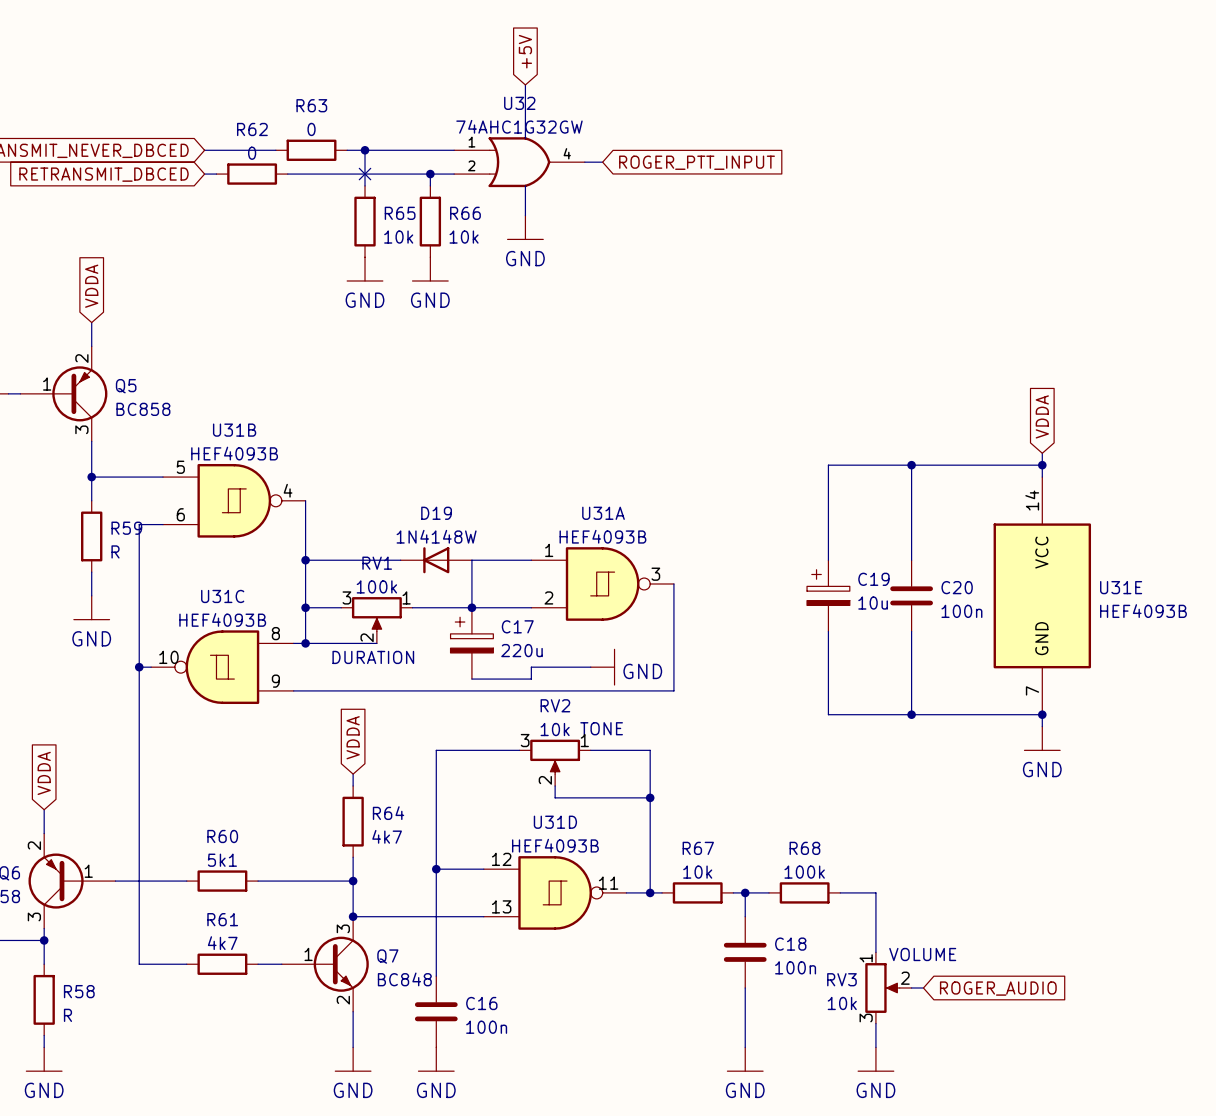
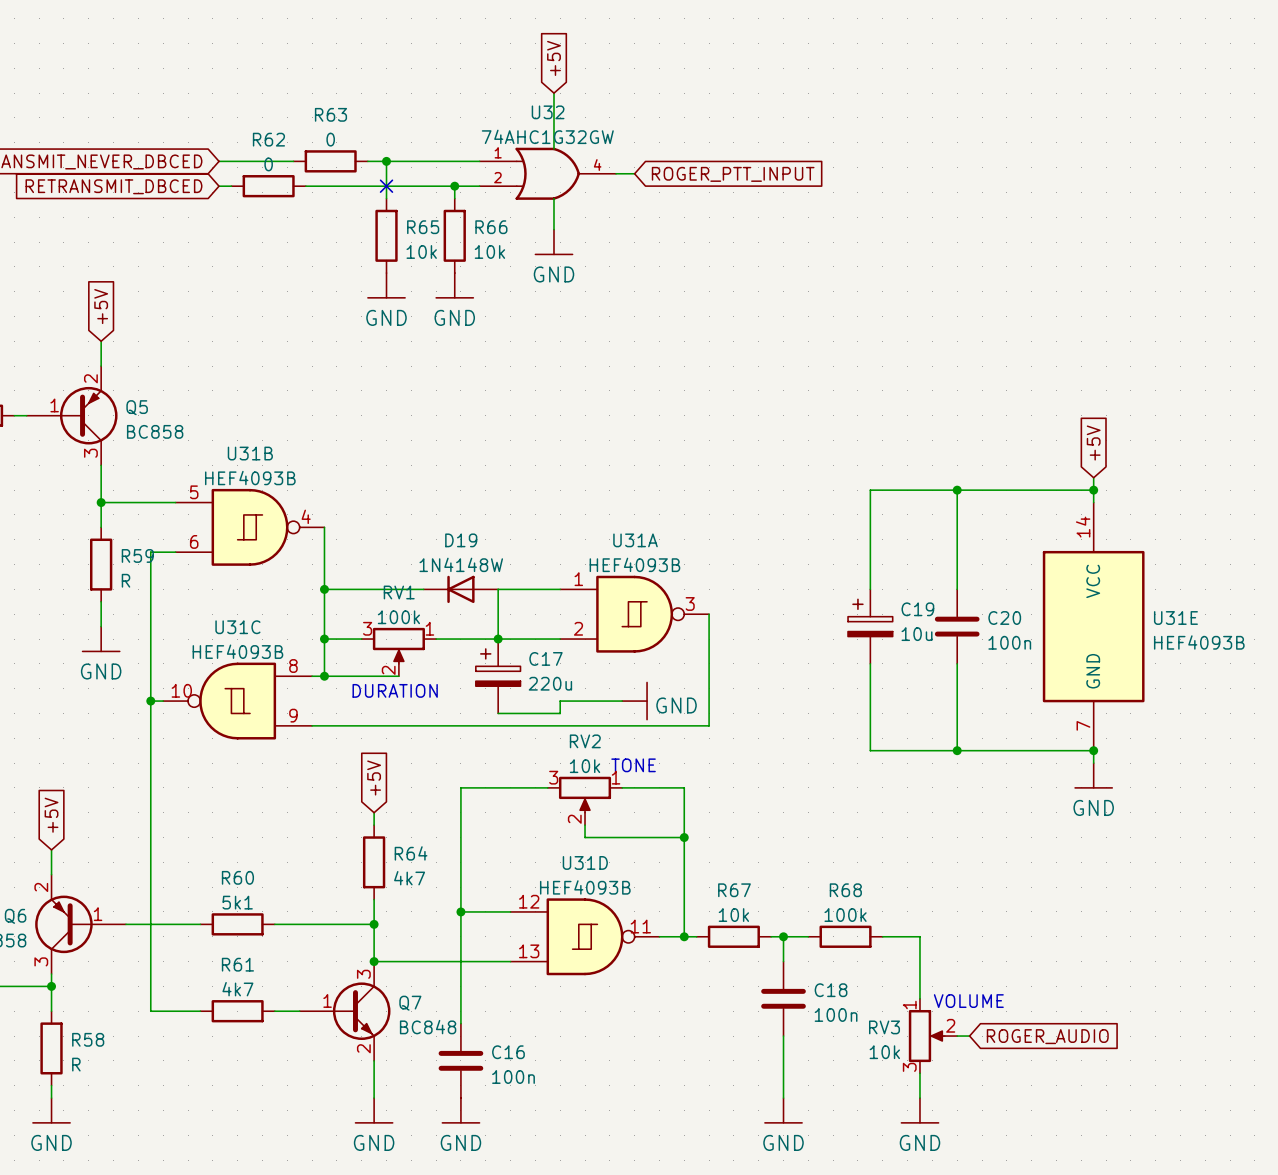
global label: VDDA (91, 286) -> +5V (101, 306)
global label: VDDA (1042, 416) -> +5V (1093, 443)
global label: VDDA (353, 737) -> +5V (374, 777)
global label: VDDA (44, 773) -> +5V (51, 815)

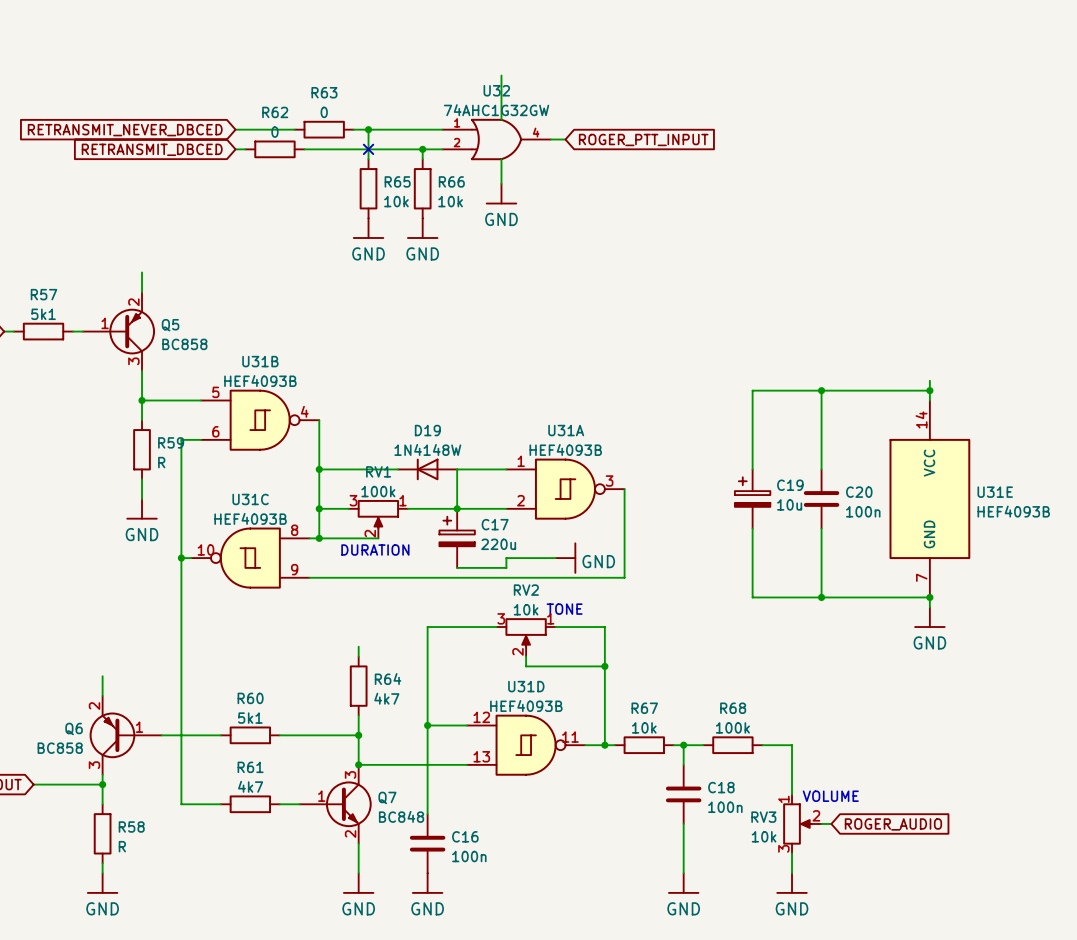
global label: +5V (553, 58) -> none
global label: +5V (101, 306) -> none
global label: +5V (1093, 443) -> none
global label: +5V (374, 777) -> none
global label: +5V (51, 815) -> none

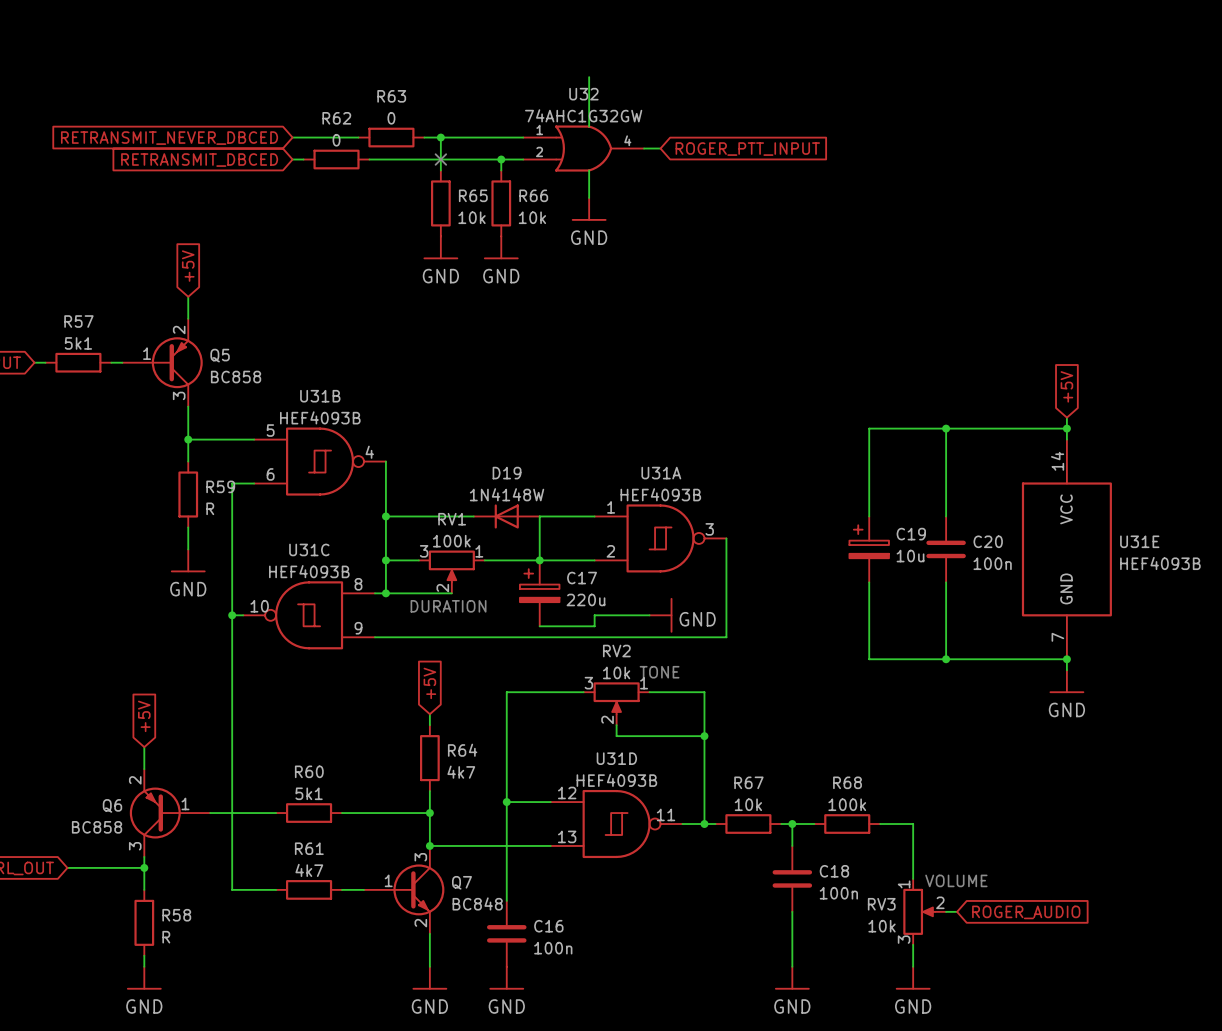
global label: none -> +5V (188, 266)
global label: none -> +5V (1066, 386)
global label: none -> +5V (429, 683)
global label: none -> +5V (144, 716)

